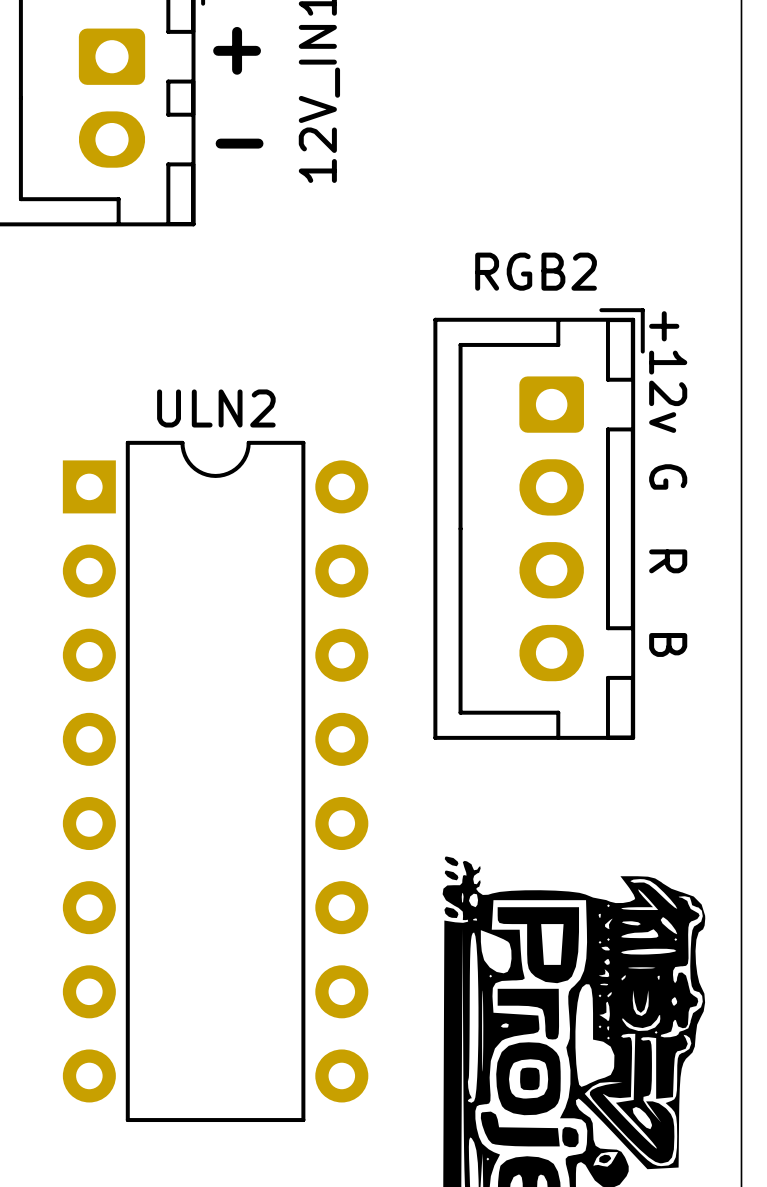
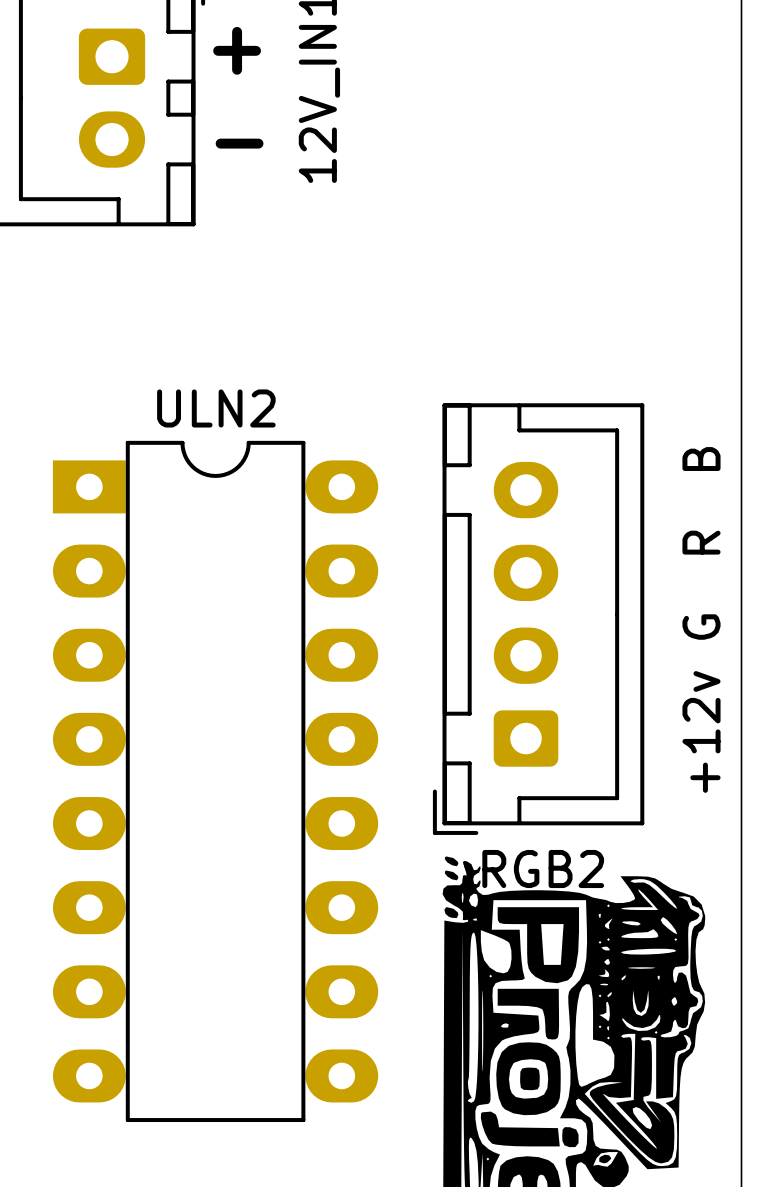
ULN2 footprint: [62, 440, 369, 1123] -> [52, 440, 379, 1123]
text rotation: 0° (668, 484) -> 180° (701, 619)
RGB2 rotation: 0° (539, 524) -> 180° (538, 619)

